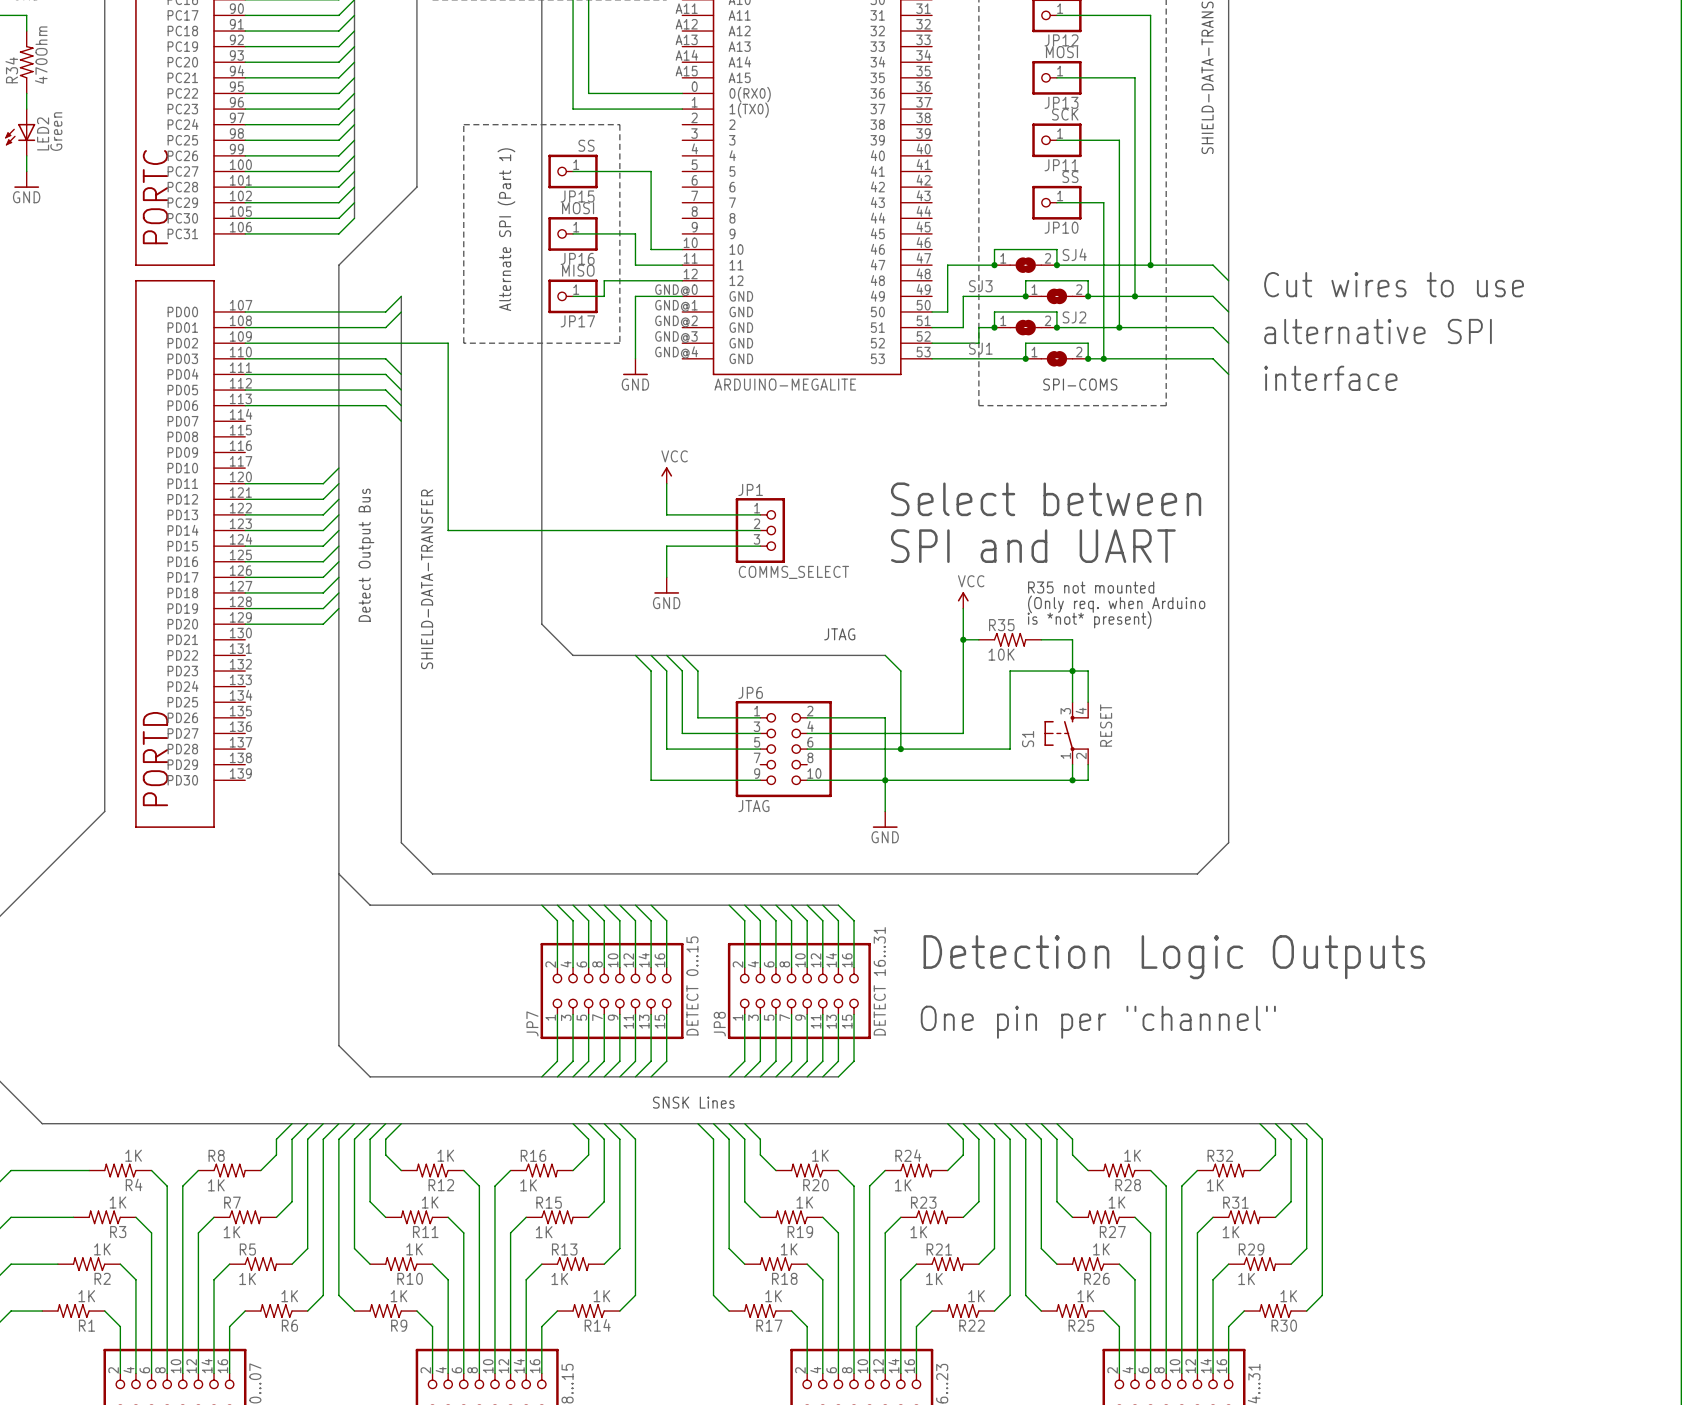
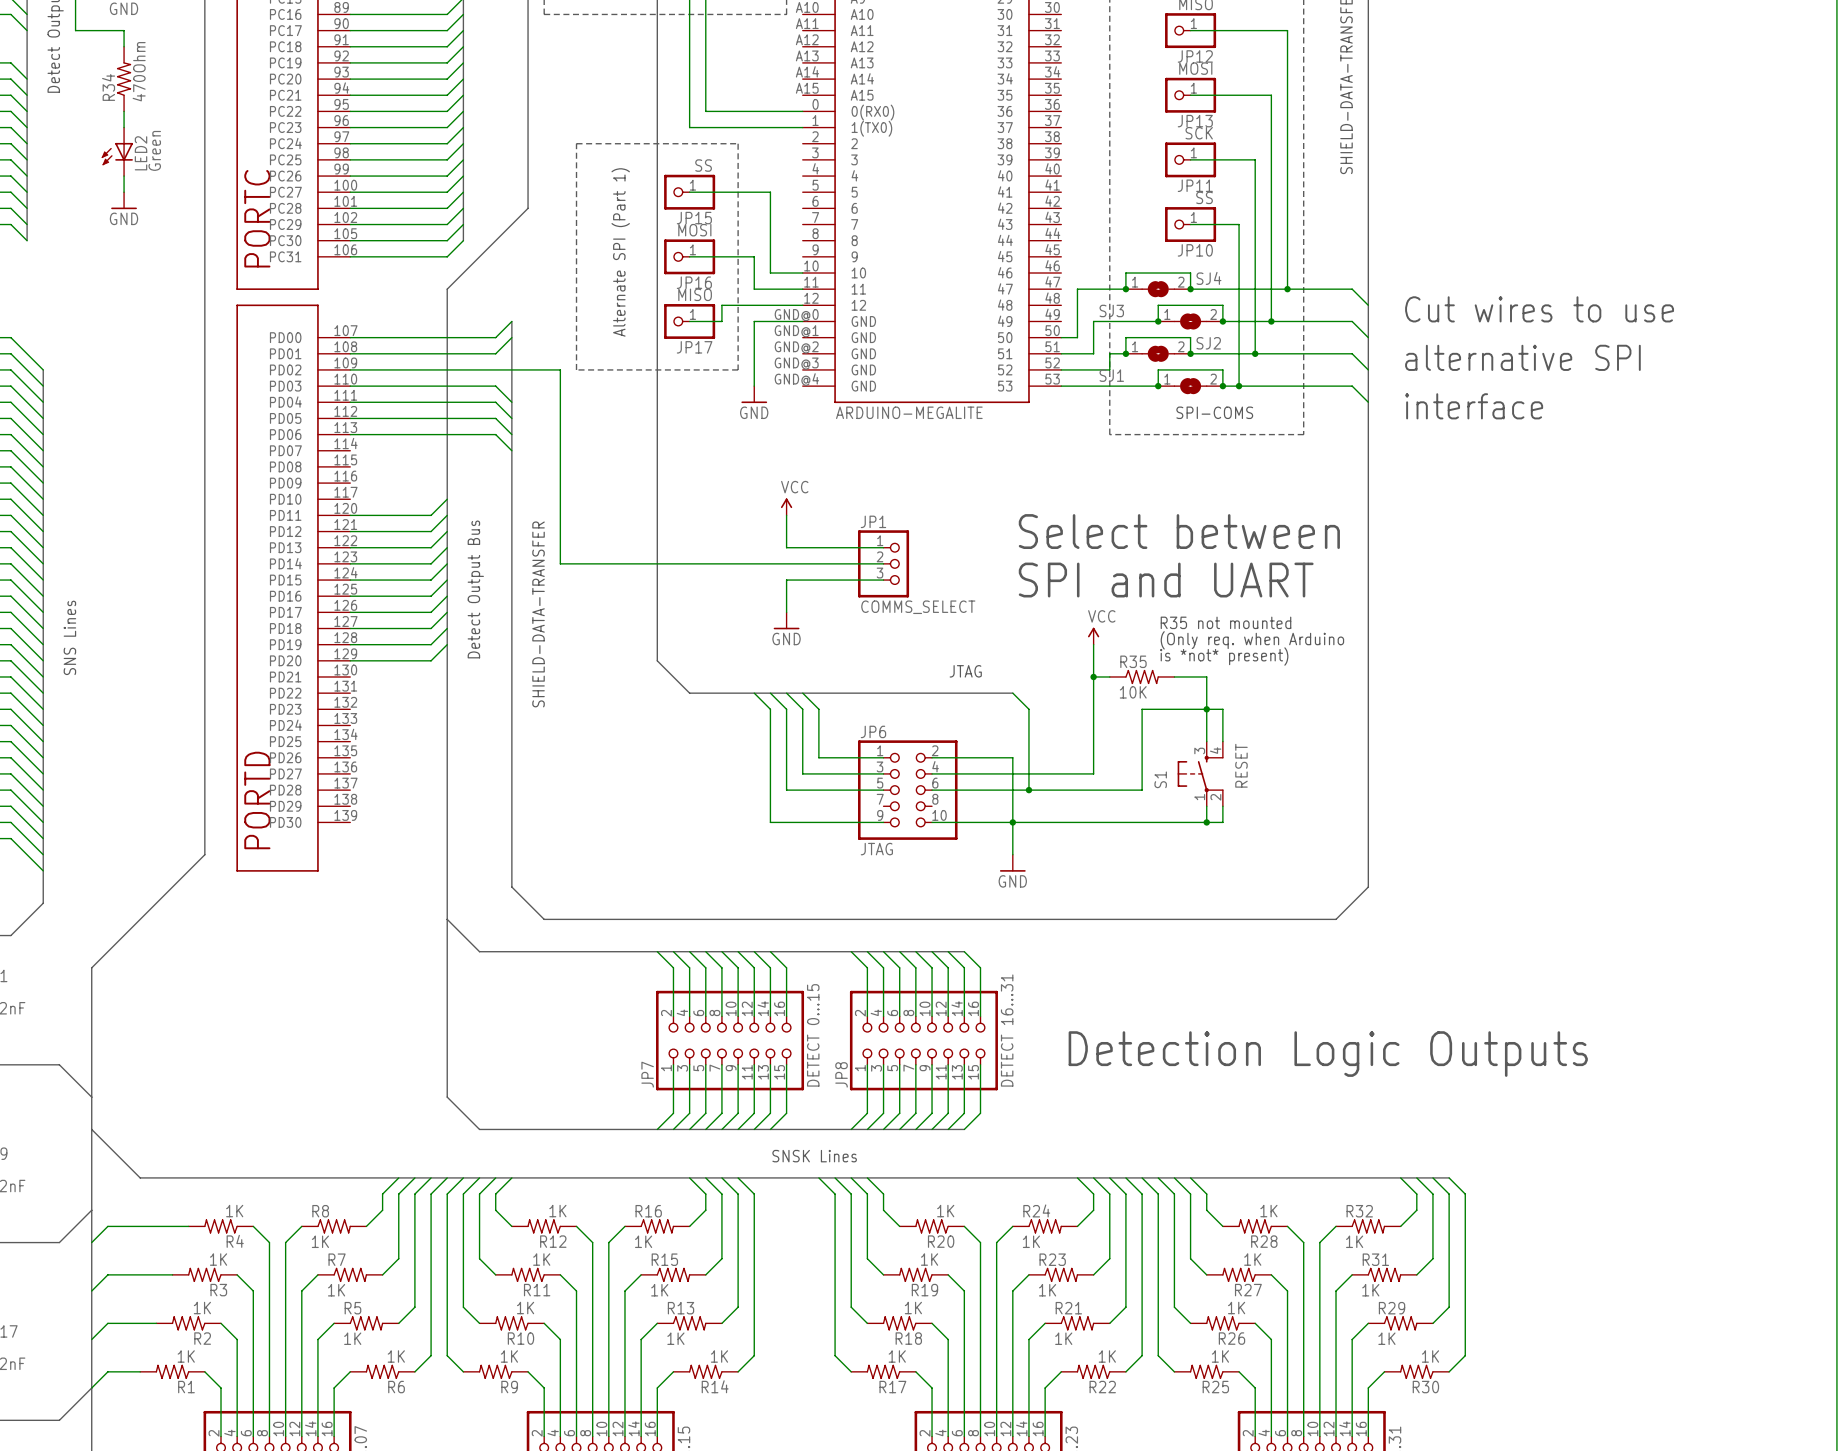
text position: Detection Logic Outputs (1174, 957) -> Detection Logic Outputs (1328, 1054)
text: One pin per "channel" (1098, 1022) -> none

